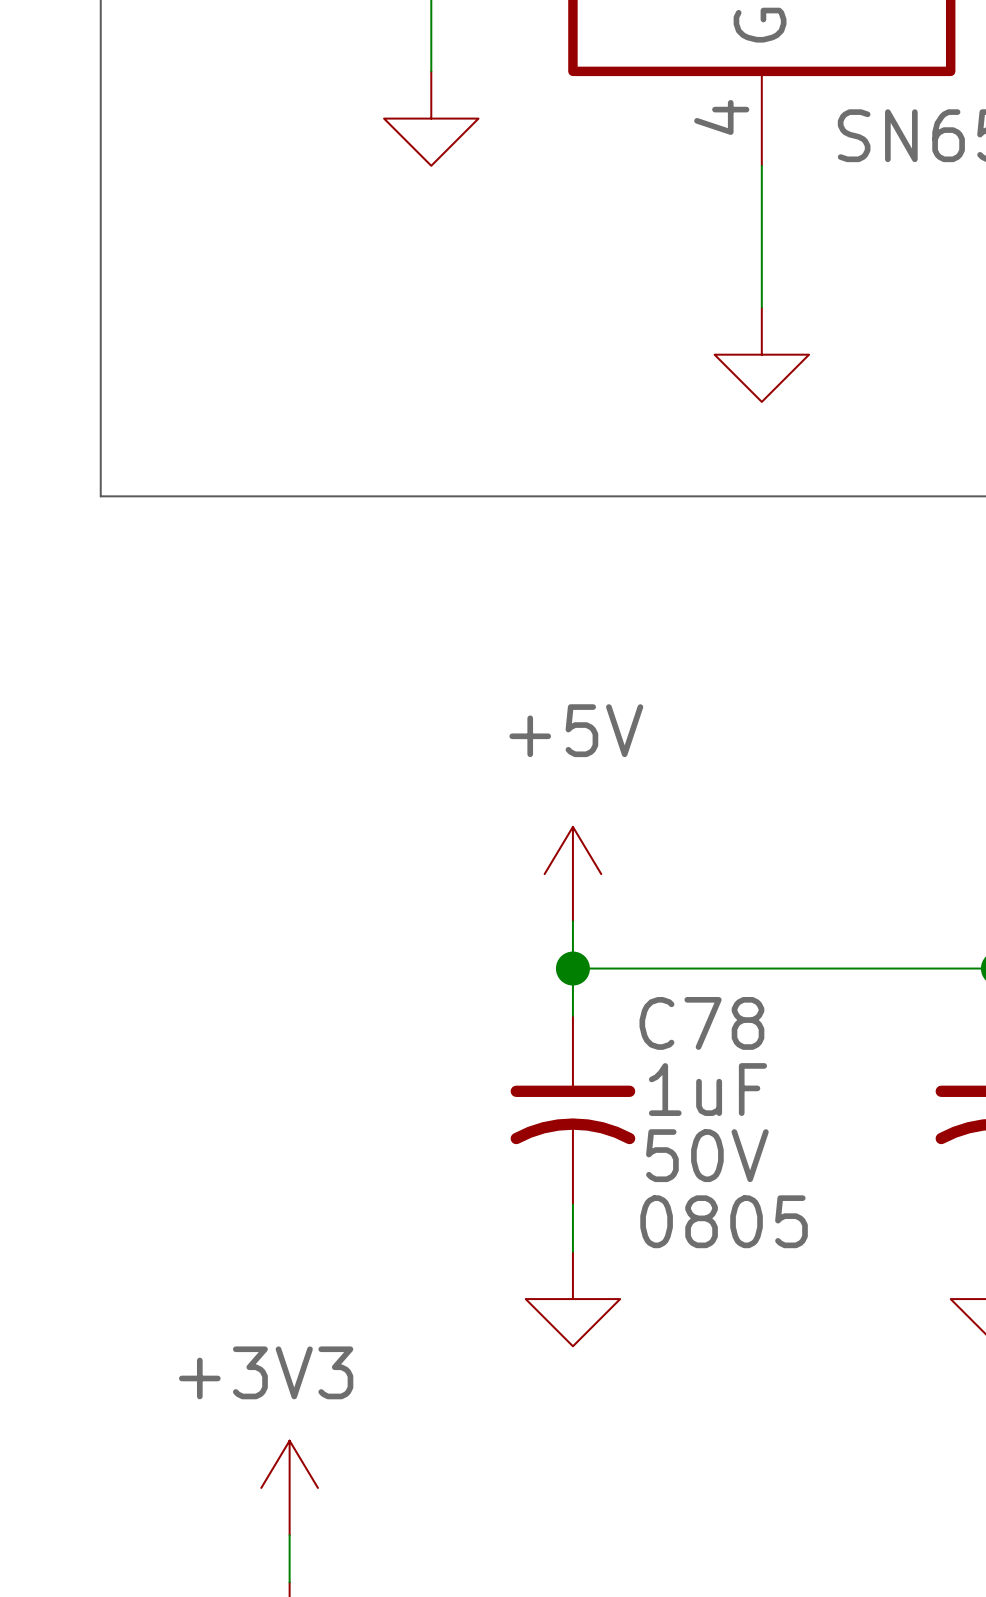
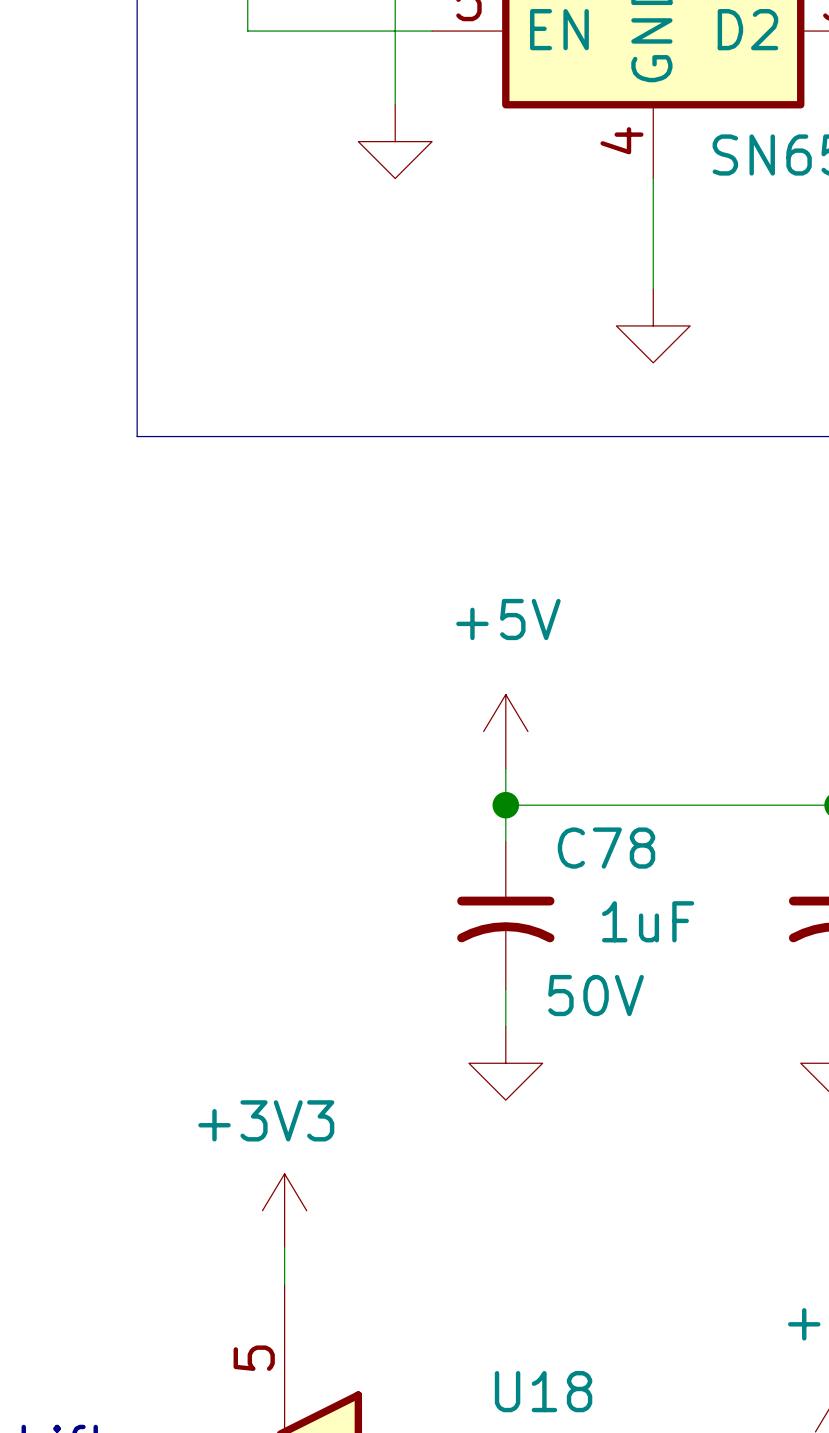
C78 value position: 1uF (707, 1089) -> 1uF (648, 921)
C78 text position: 50V (707, 1155) -> 50V (596, 995)
C78 text: 0805 (724, 1221) -> none

